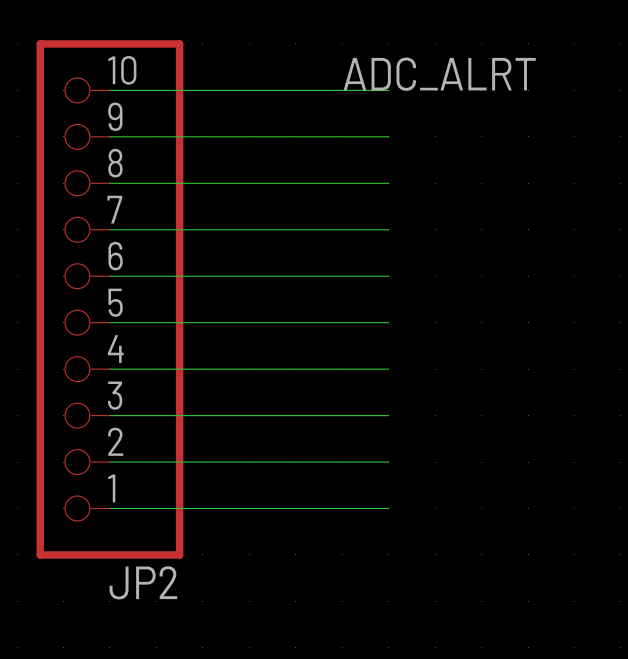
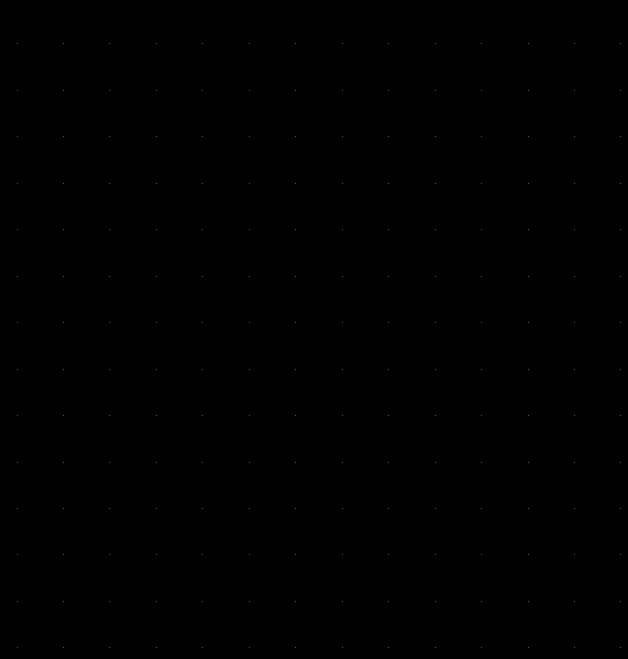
label: ADC_ALRT (439, 74) -> none
wire: (109, 90) (388, 90) -> none
wire: (109, 136) (388, 136) -> none
wire: (109, 183) (388, 183) -> none
wire: (109, 229) (388, 229) -> none
wire: (109, 276) (388, 276) -> none
JP2: (109, 299) -> none
wire: (109, 322) (388, 322) -> none
wire: (109, 369) (388, 369) -> none
wire: (109, 415) (388, 415) -> none
wire: (109, 462) (388, 462) -> none
wire: (109, 508) (388, 508) -> none

